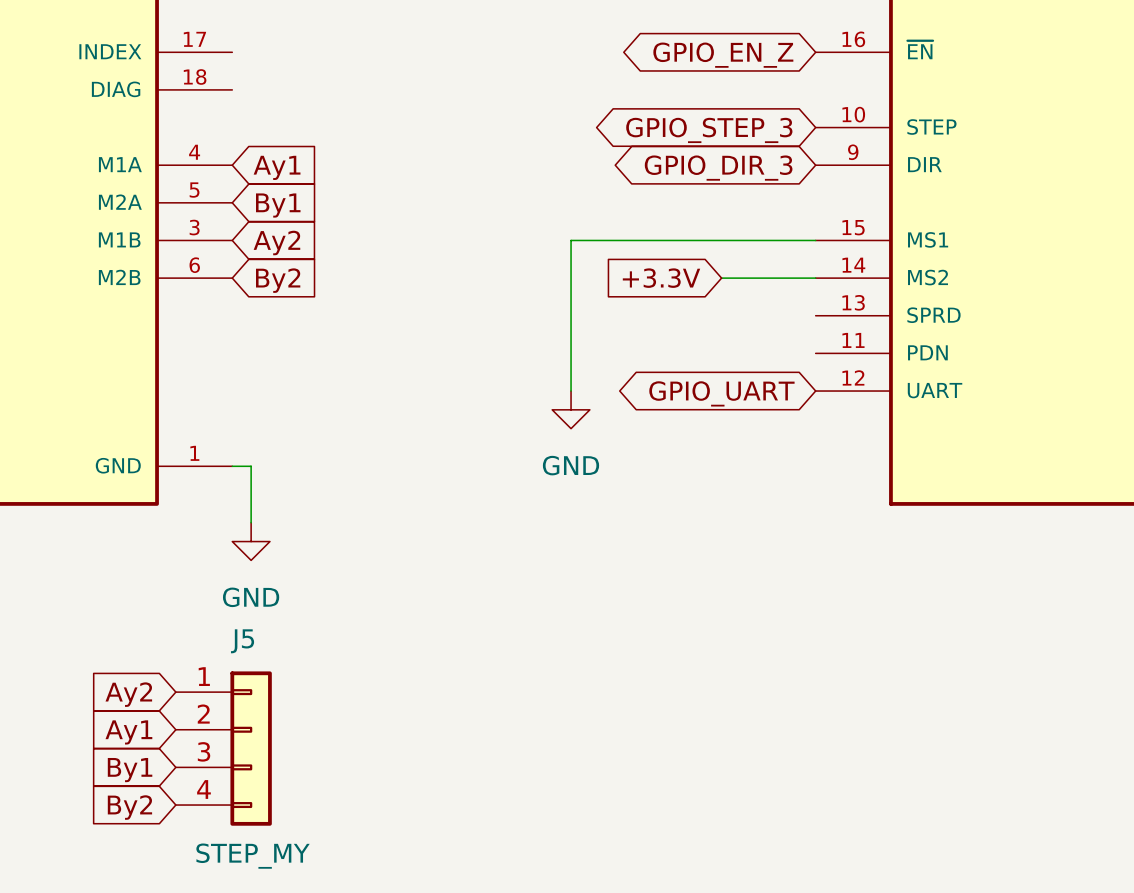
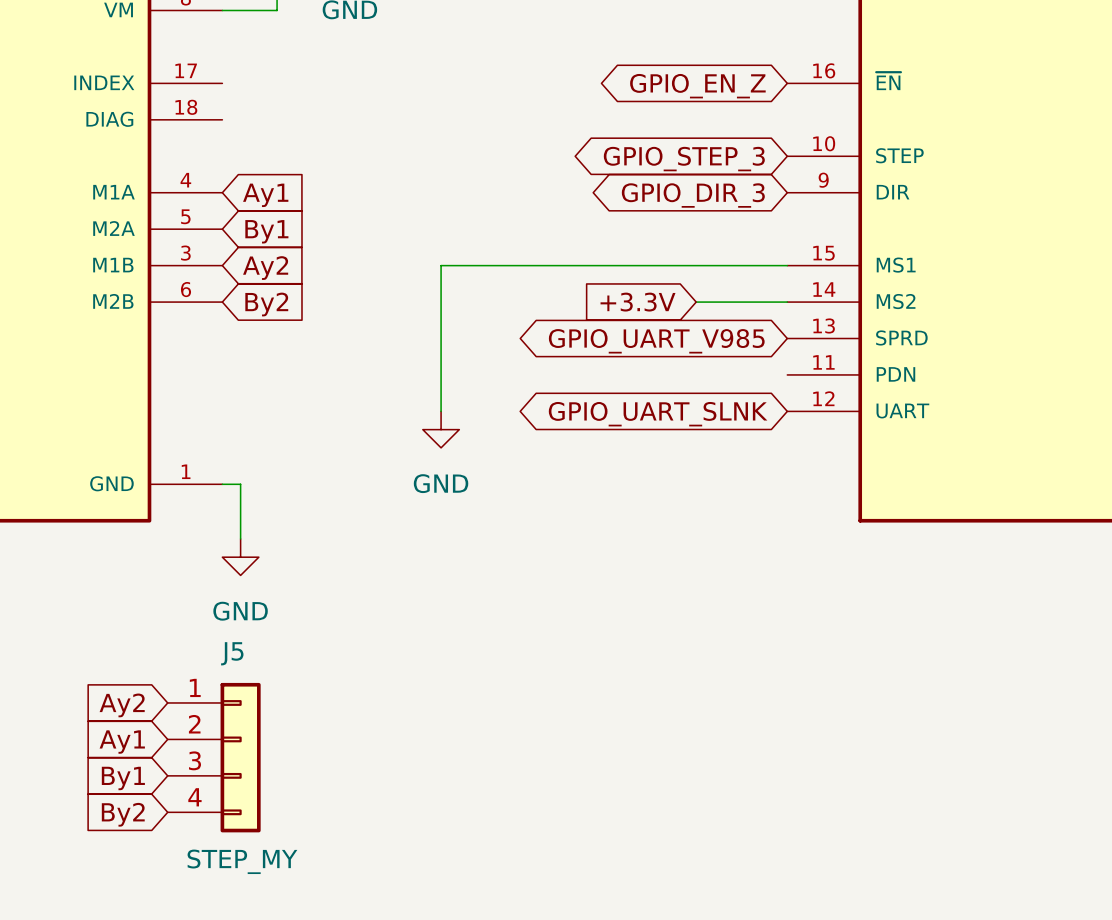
wire: (571, 240) (571, 391) -> (550, 265) (441, 265) (441, 411)
global label: none -> GPIO_UART_V985 (656, 341)
global label: GPIO_UART (721, 393) -> GPIO_UART_SLNK (658, 414)
power symbol position: GND (571, 409) -> GND (441, 429)

